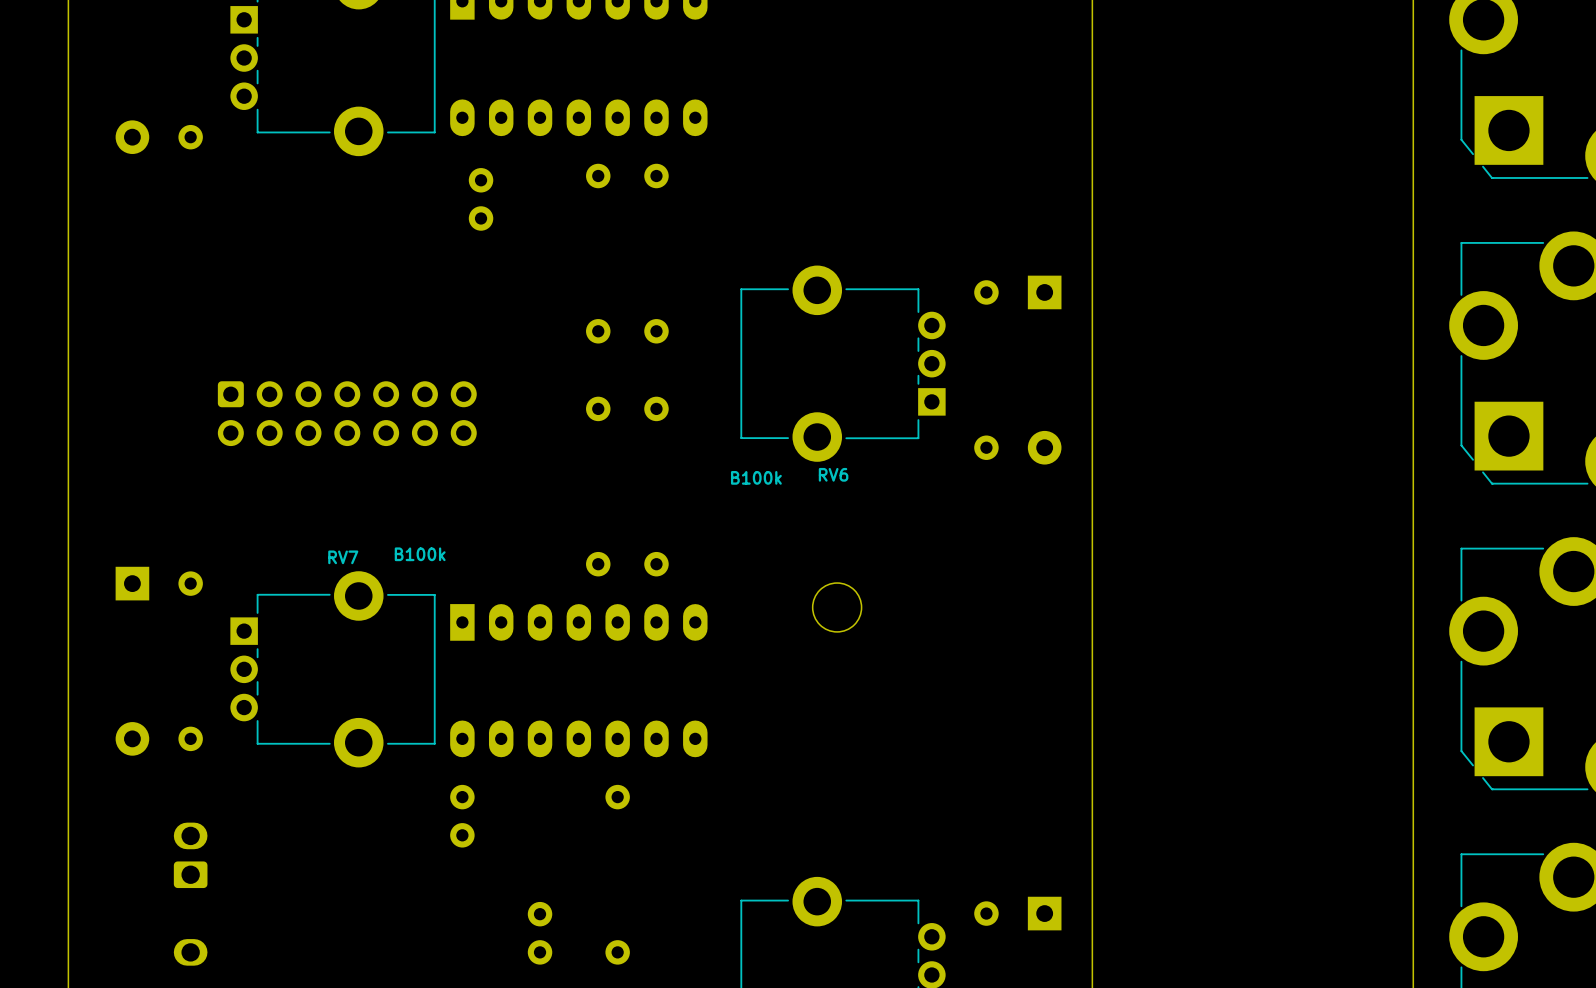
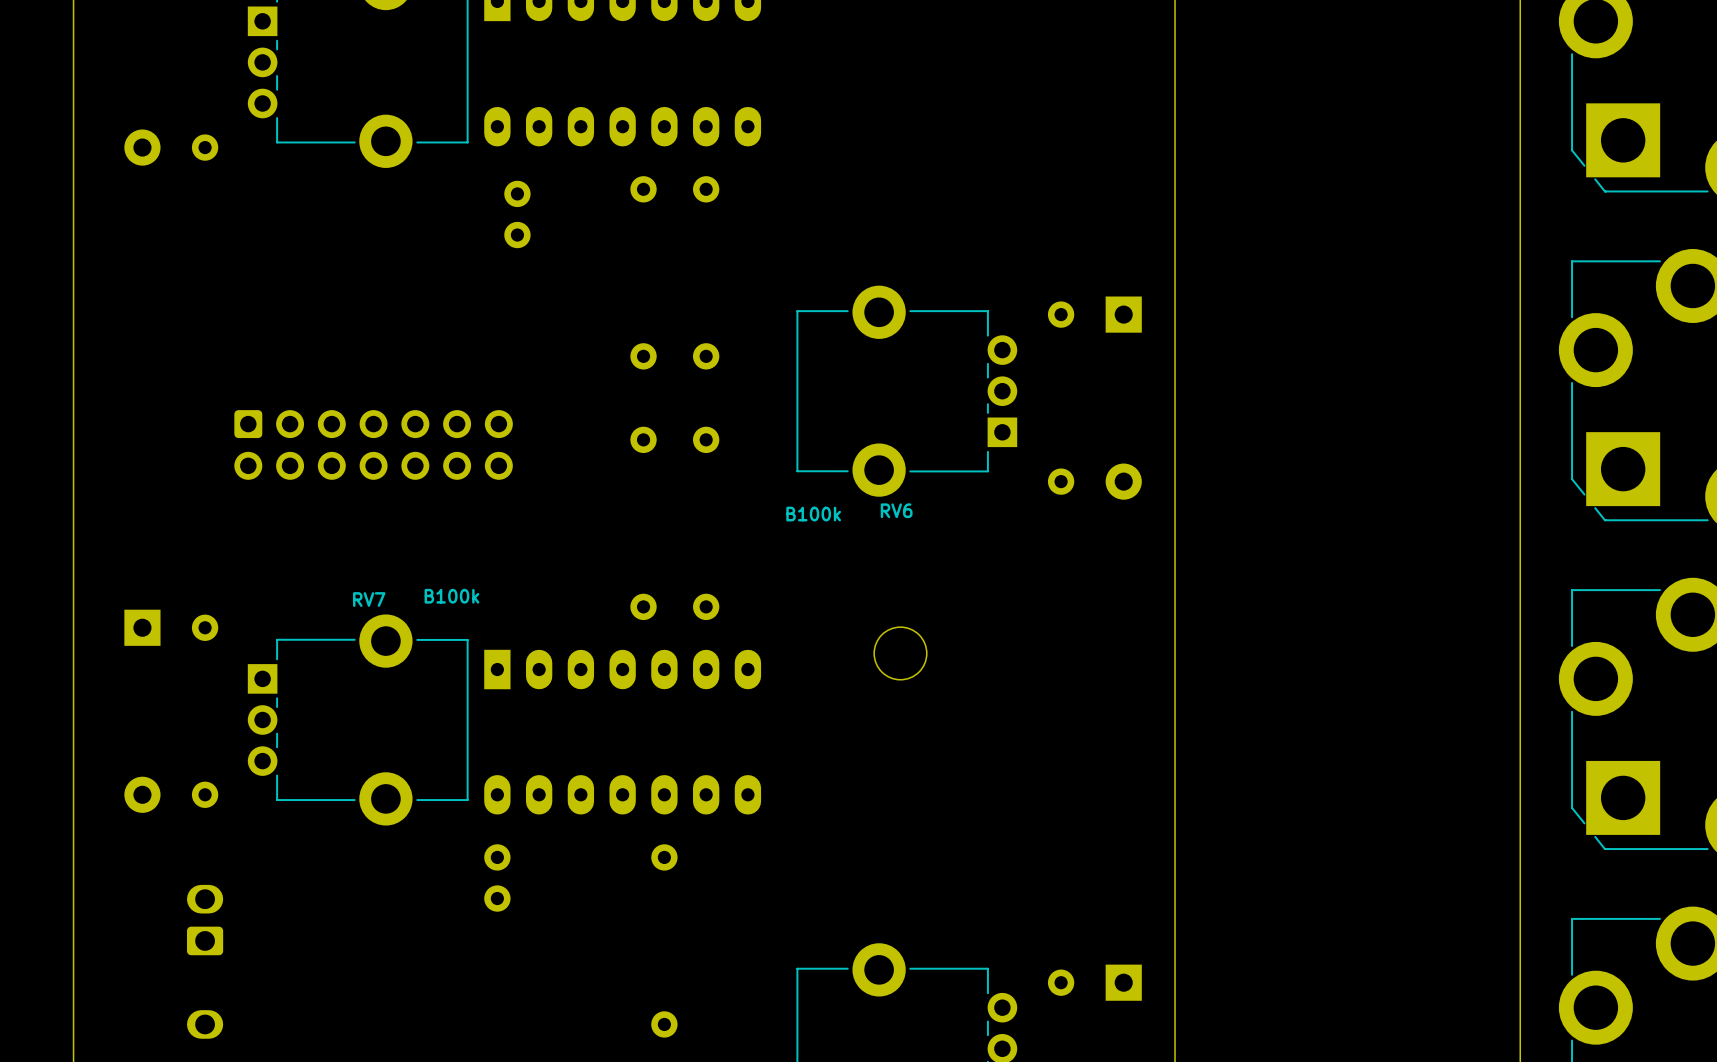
part: (540, 933) -> none

